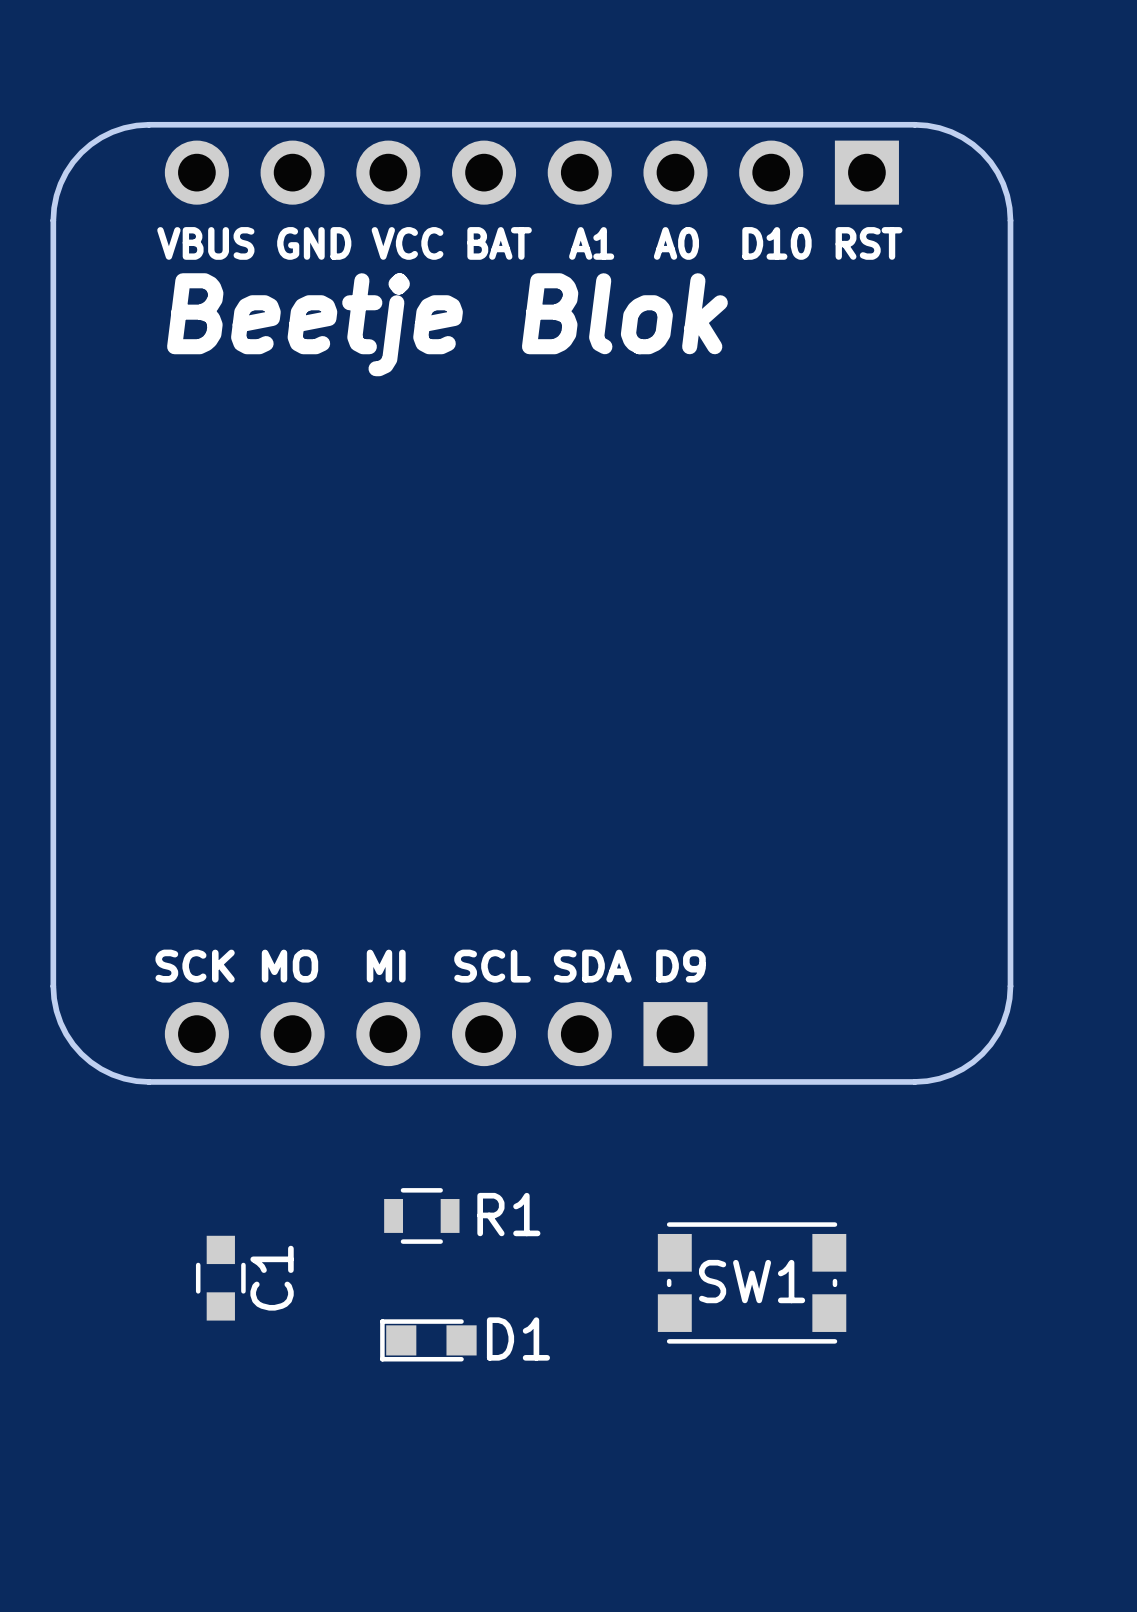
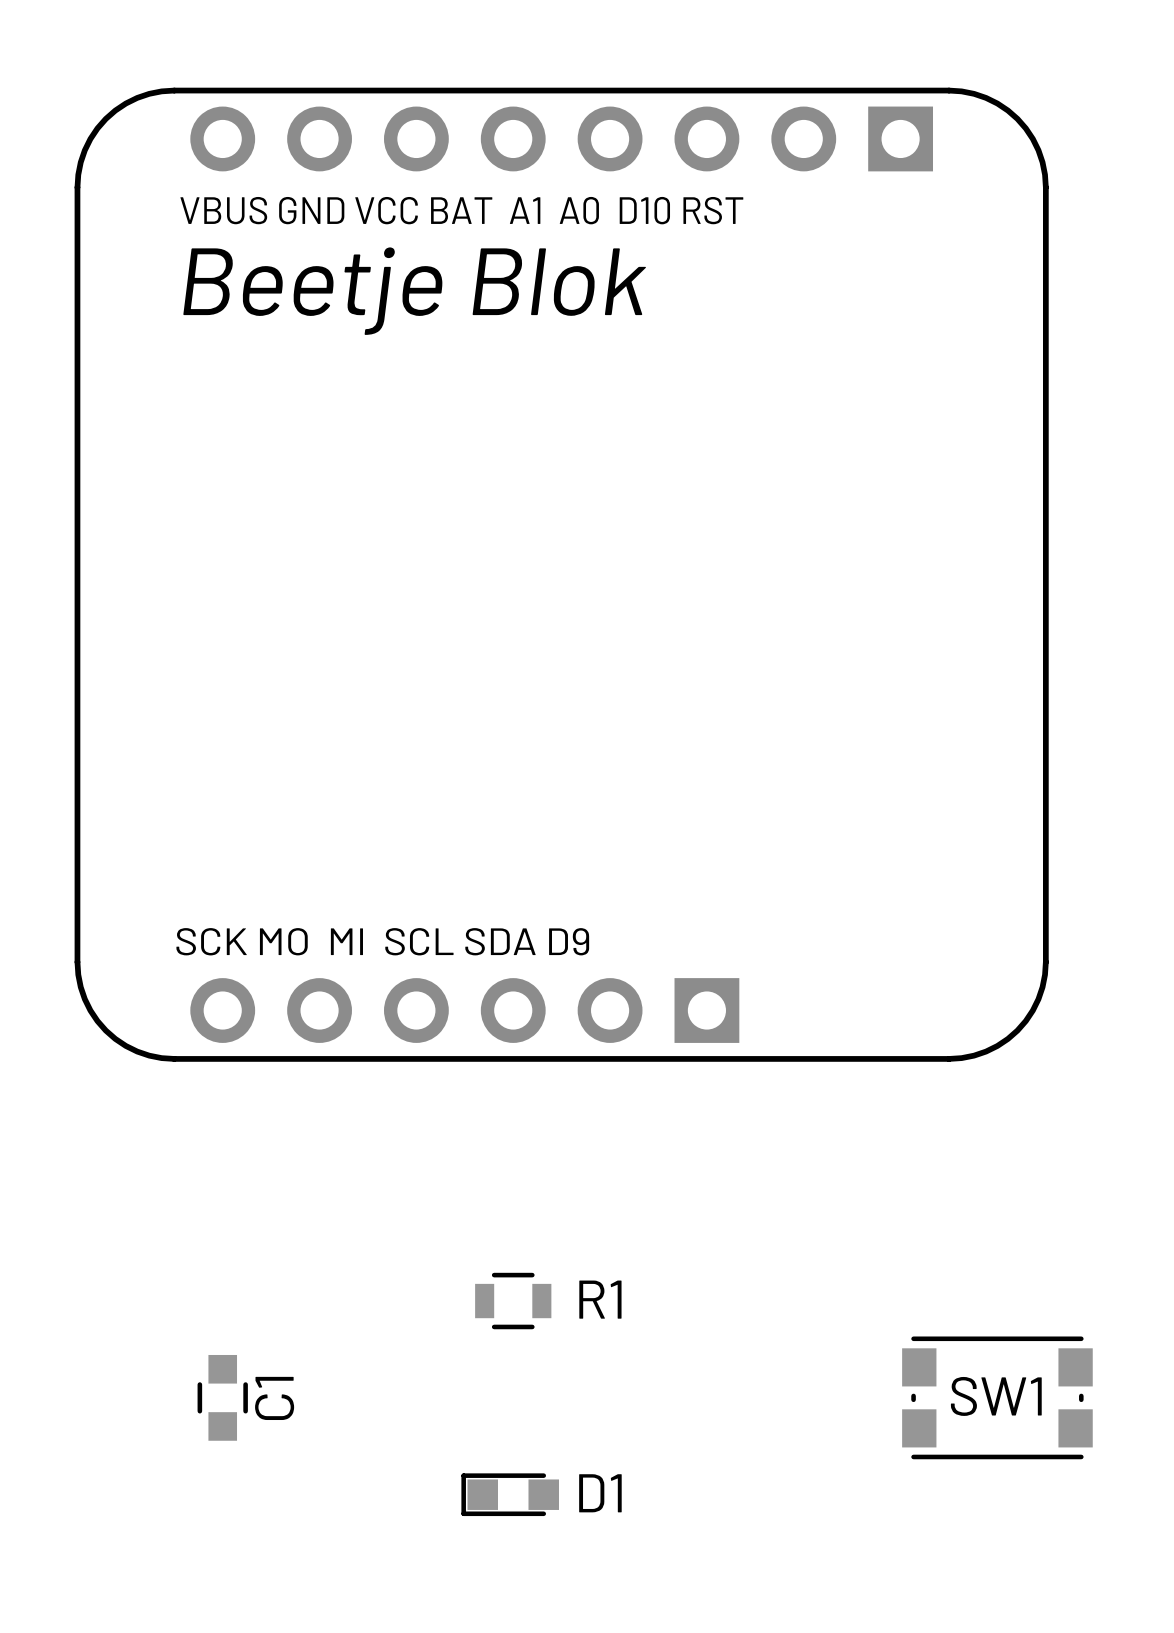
R1 position: (421, 1215) -> (513, 1301)
C1 position: (220, 1278) -> (222, 1397)
SW1 position: (752, 1282) -> (997, 1397)
D1 position: (428, 1340) -> (510, 1494)

